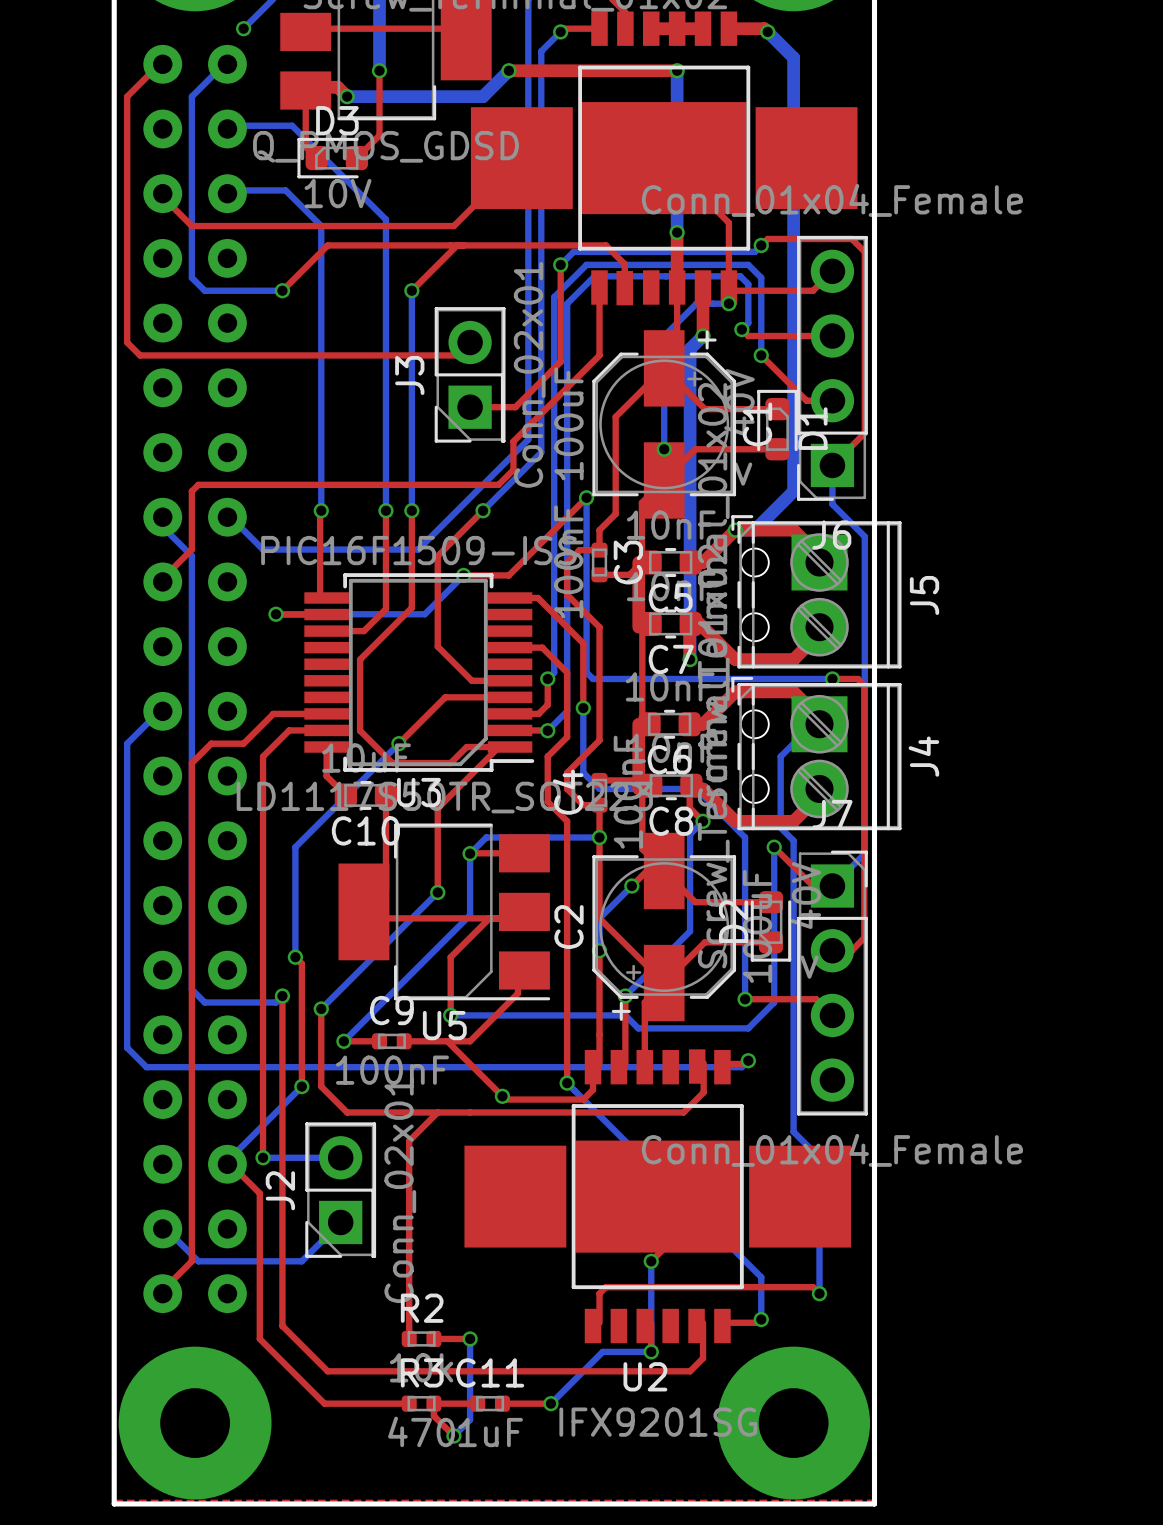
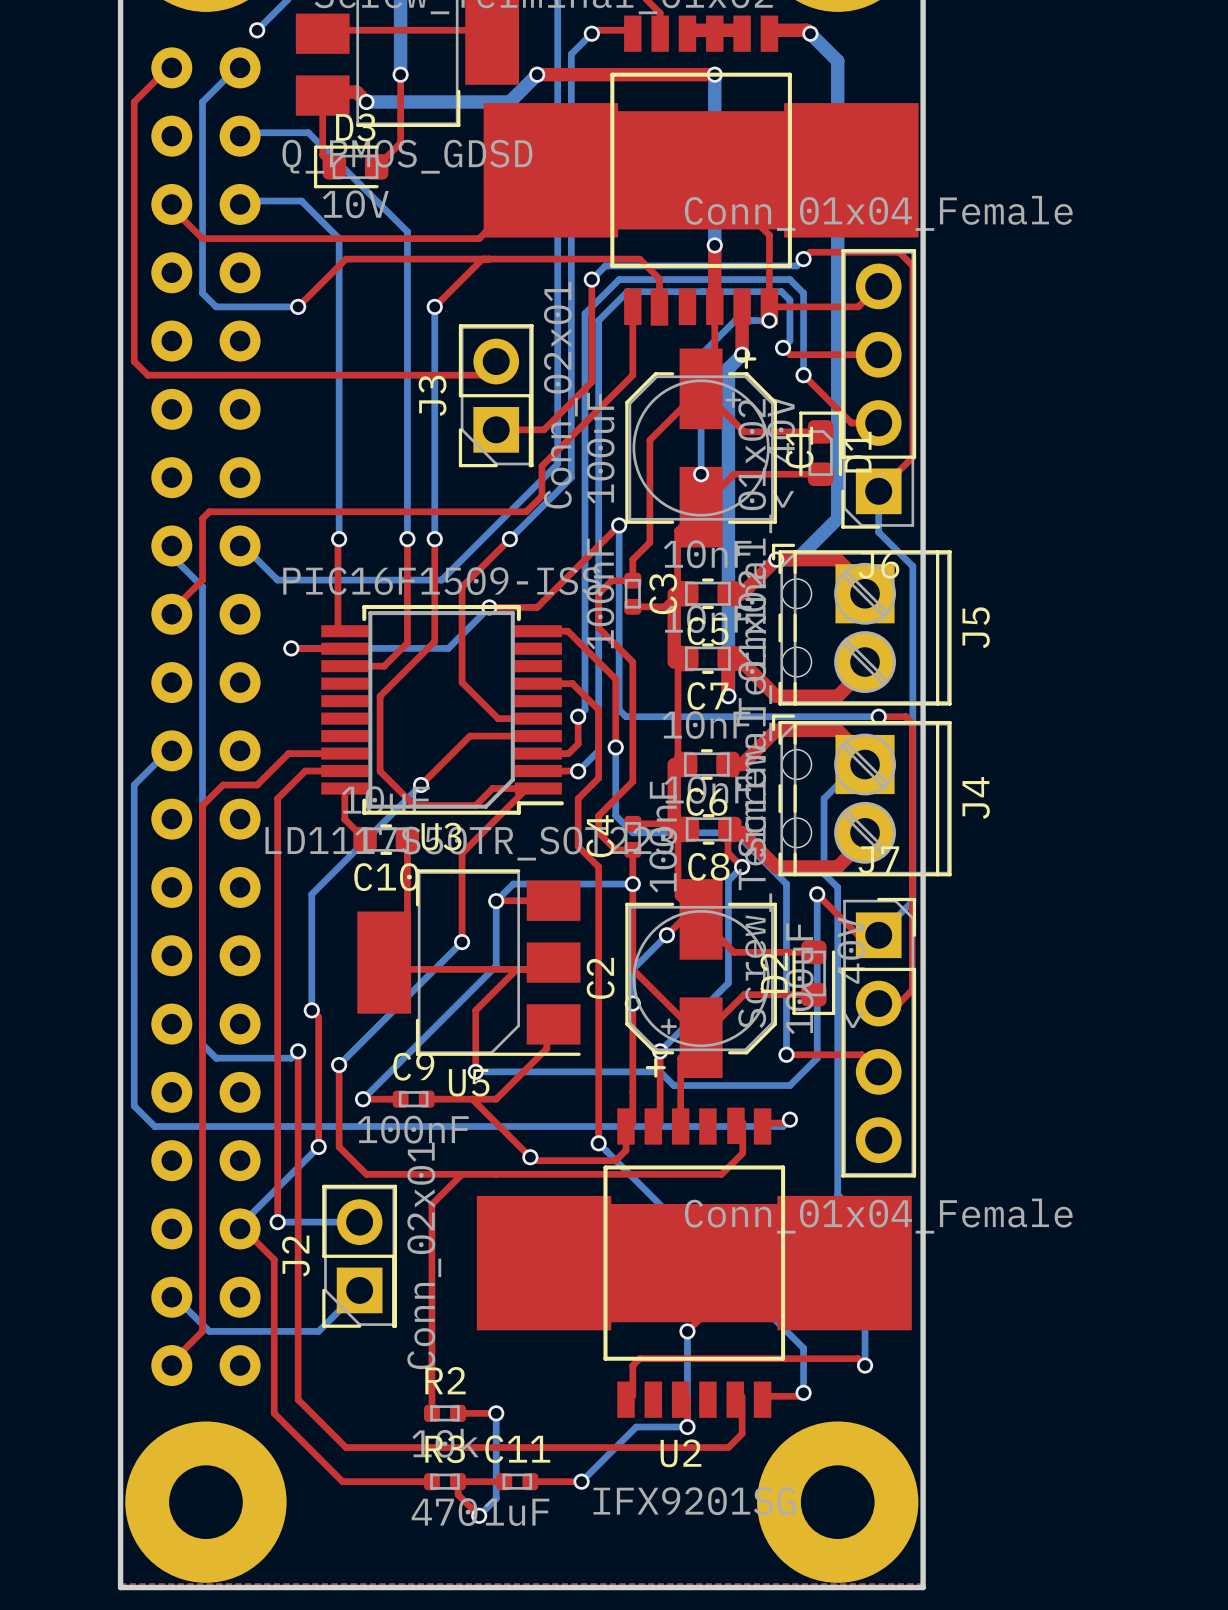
part footprint: [470, 11, 858, 306] -> [483, 15, 919, 326]
U2 footprint: [464, 1049, 852, 1344] -> [476, 1107, 912, 1418]

